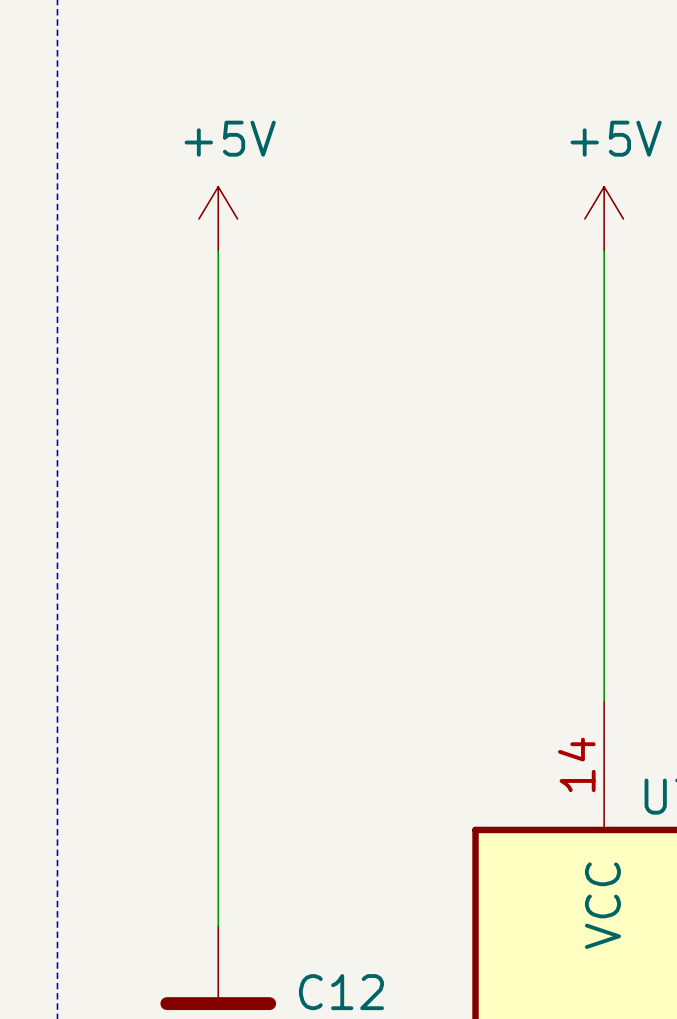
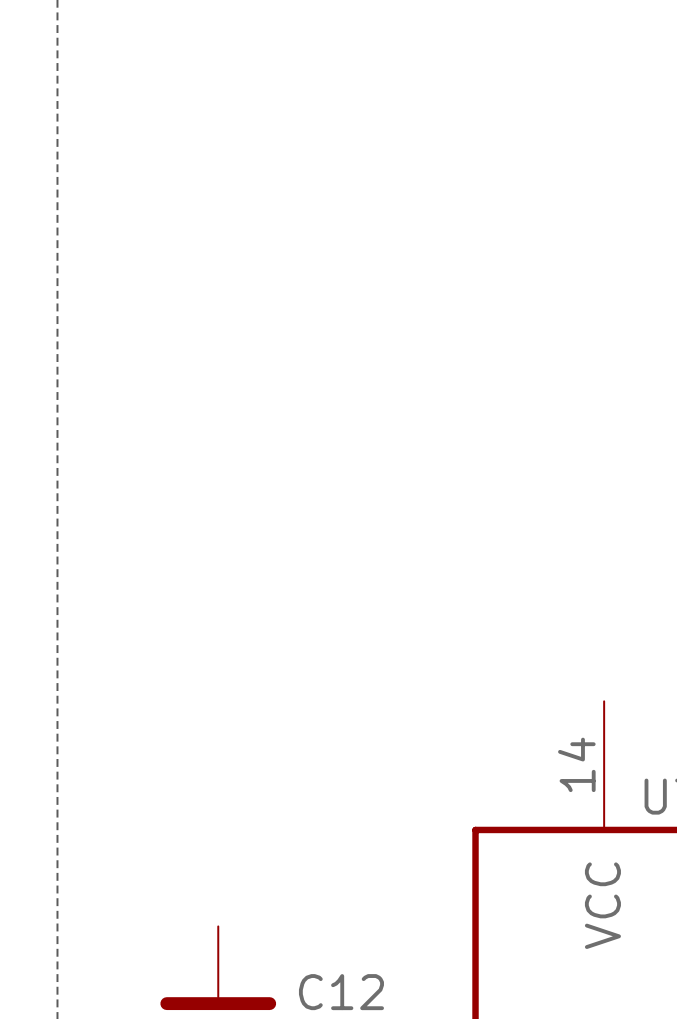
power symbol: +5V (218, 218) -> none
power symbol: +5V (604, 218) -> none
wire: (218, 251) (218, 926) -> none
wire: (604, 251) (604, 701) -> none

